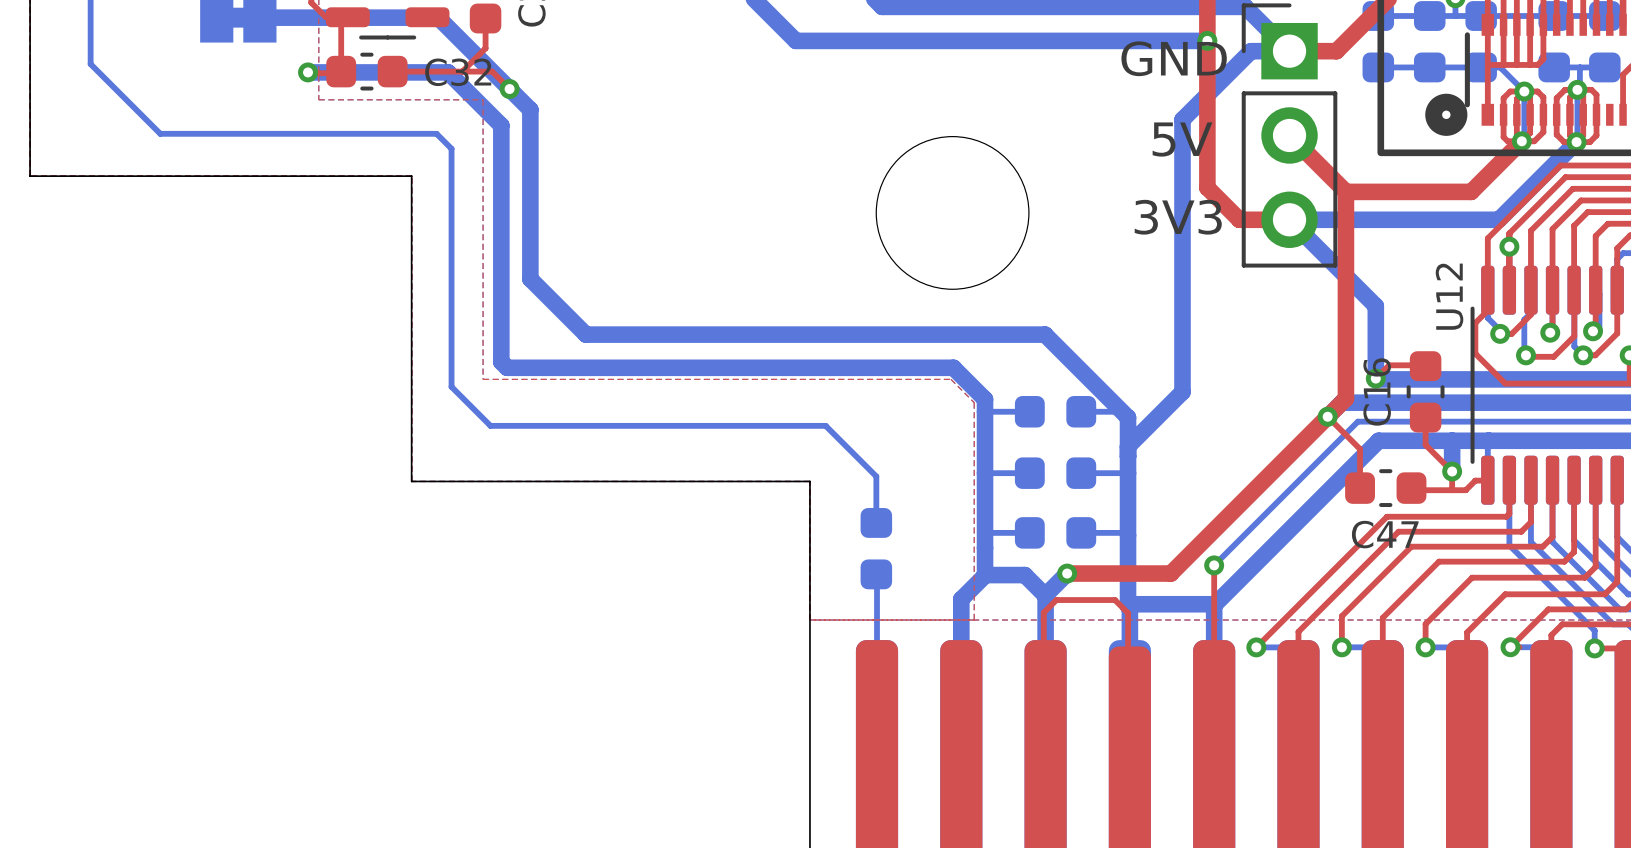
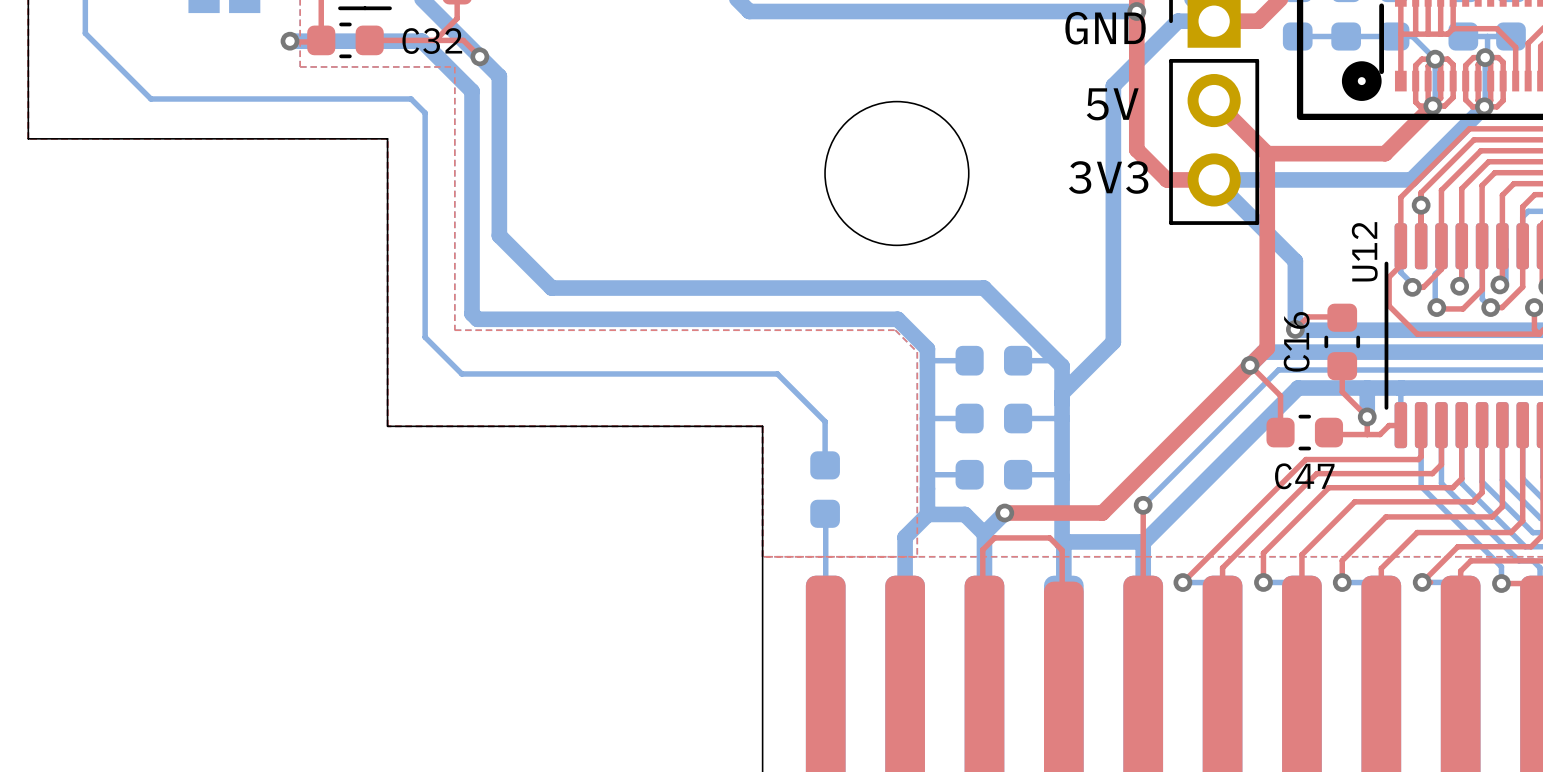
top track: none -> (1453, 28) (1496, 28) (1515, 47) (1515, 81)

